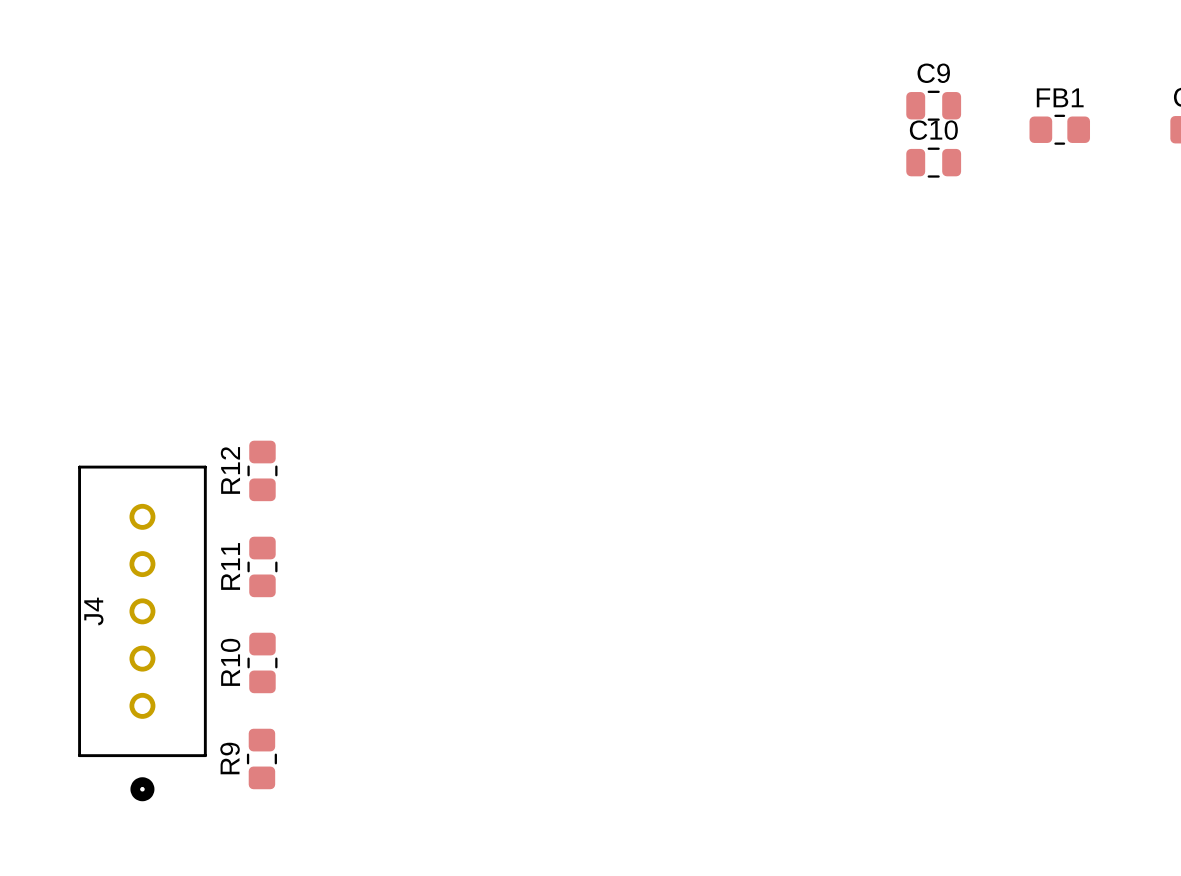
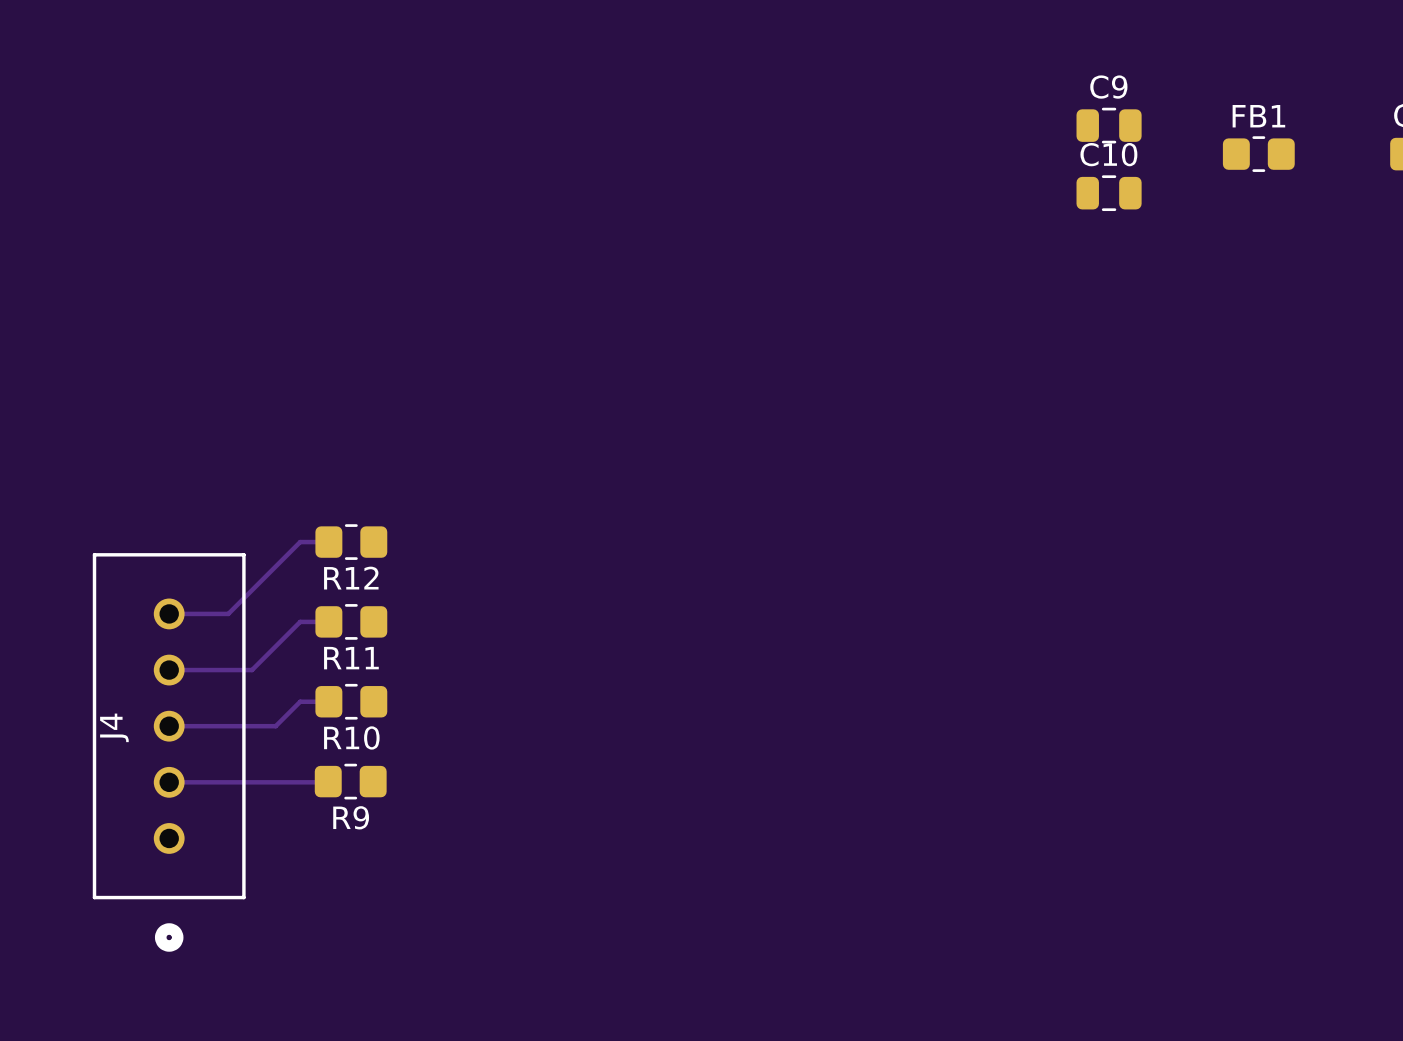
track: none -> (332, 542) (300, 542) (228, 613) (169, 613)
R12 name position: R12 (230, 470) -> R12 (351, 578)
R12 rotation: 0° (262, 470) -> 90° clockwise (351, 542)
R12 position: (262, 470) -> (351, 542)
track: none -> (332, 621) (300, 621) (252, 670) (169, 670)
R11 name position: R11 (230, 566) -> R11 (351, 658)
R11 rotation: 0° (262, 566) -> 90° clockwise (351, 621)
R11 position: (262, 566) -> (351, 621)
track: none -> (332, 701) (300, 701) (275, 726) (169, 726)
track: none -> (331, 781) (169, 782)
R10 name position: R10 (230, 662) -> R10 (351, 737)
R10 rotation: 0° (262, 662) -> 90° clockwise (351, 701)
R10 position: (262, 662) -> (351, 701)
R9 name position: R9 (230, 758) -> R9 (351, 817)
R9 rotation: 0° (261, 758) -> 90° clockwise (350, 781)
R9 position: (261, 758) -> (350, 781)

